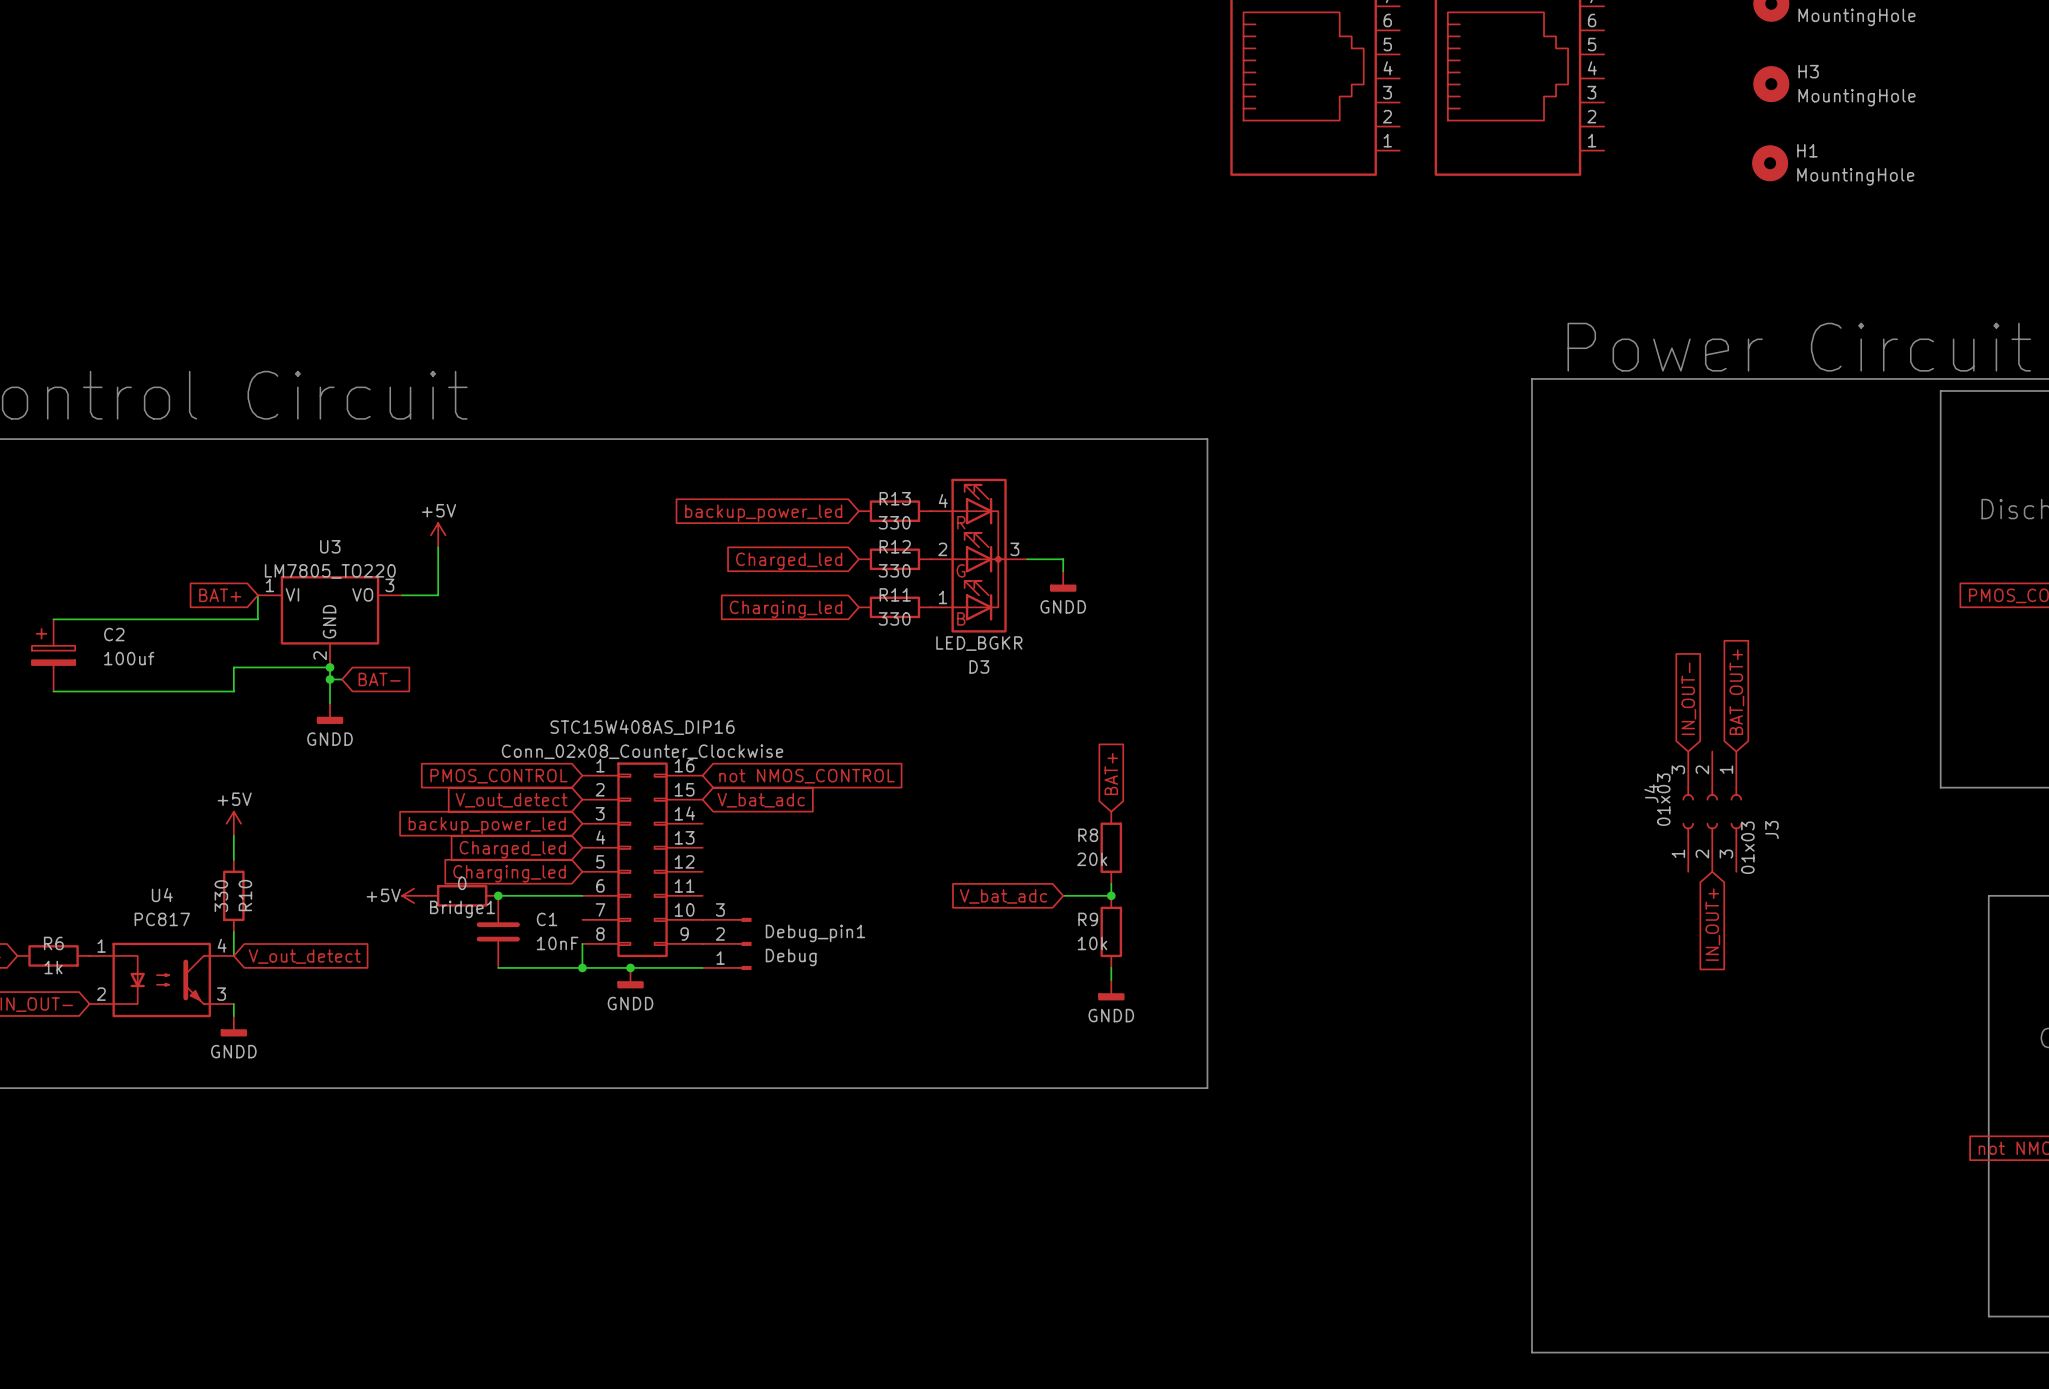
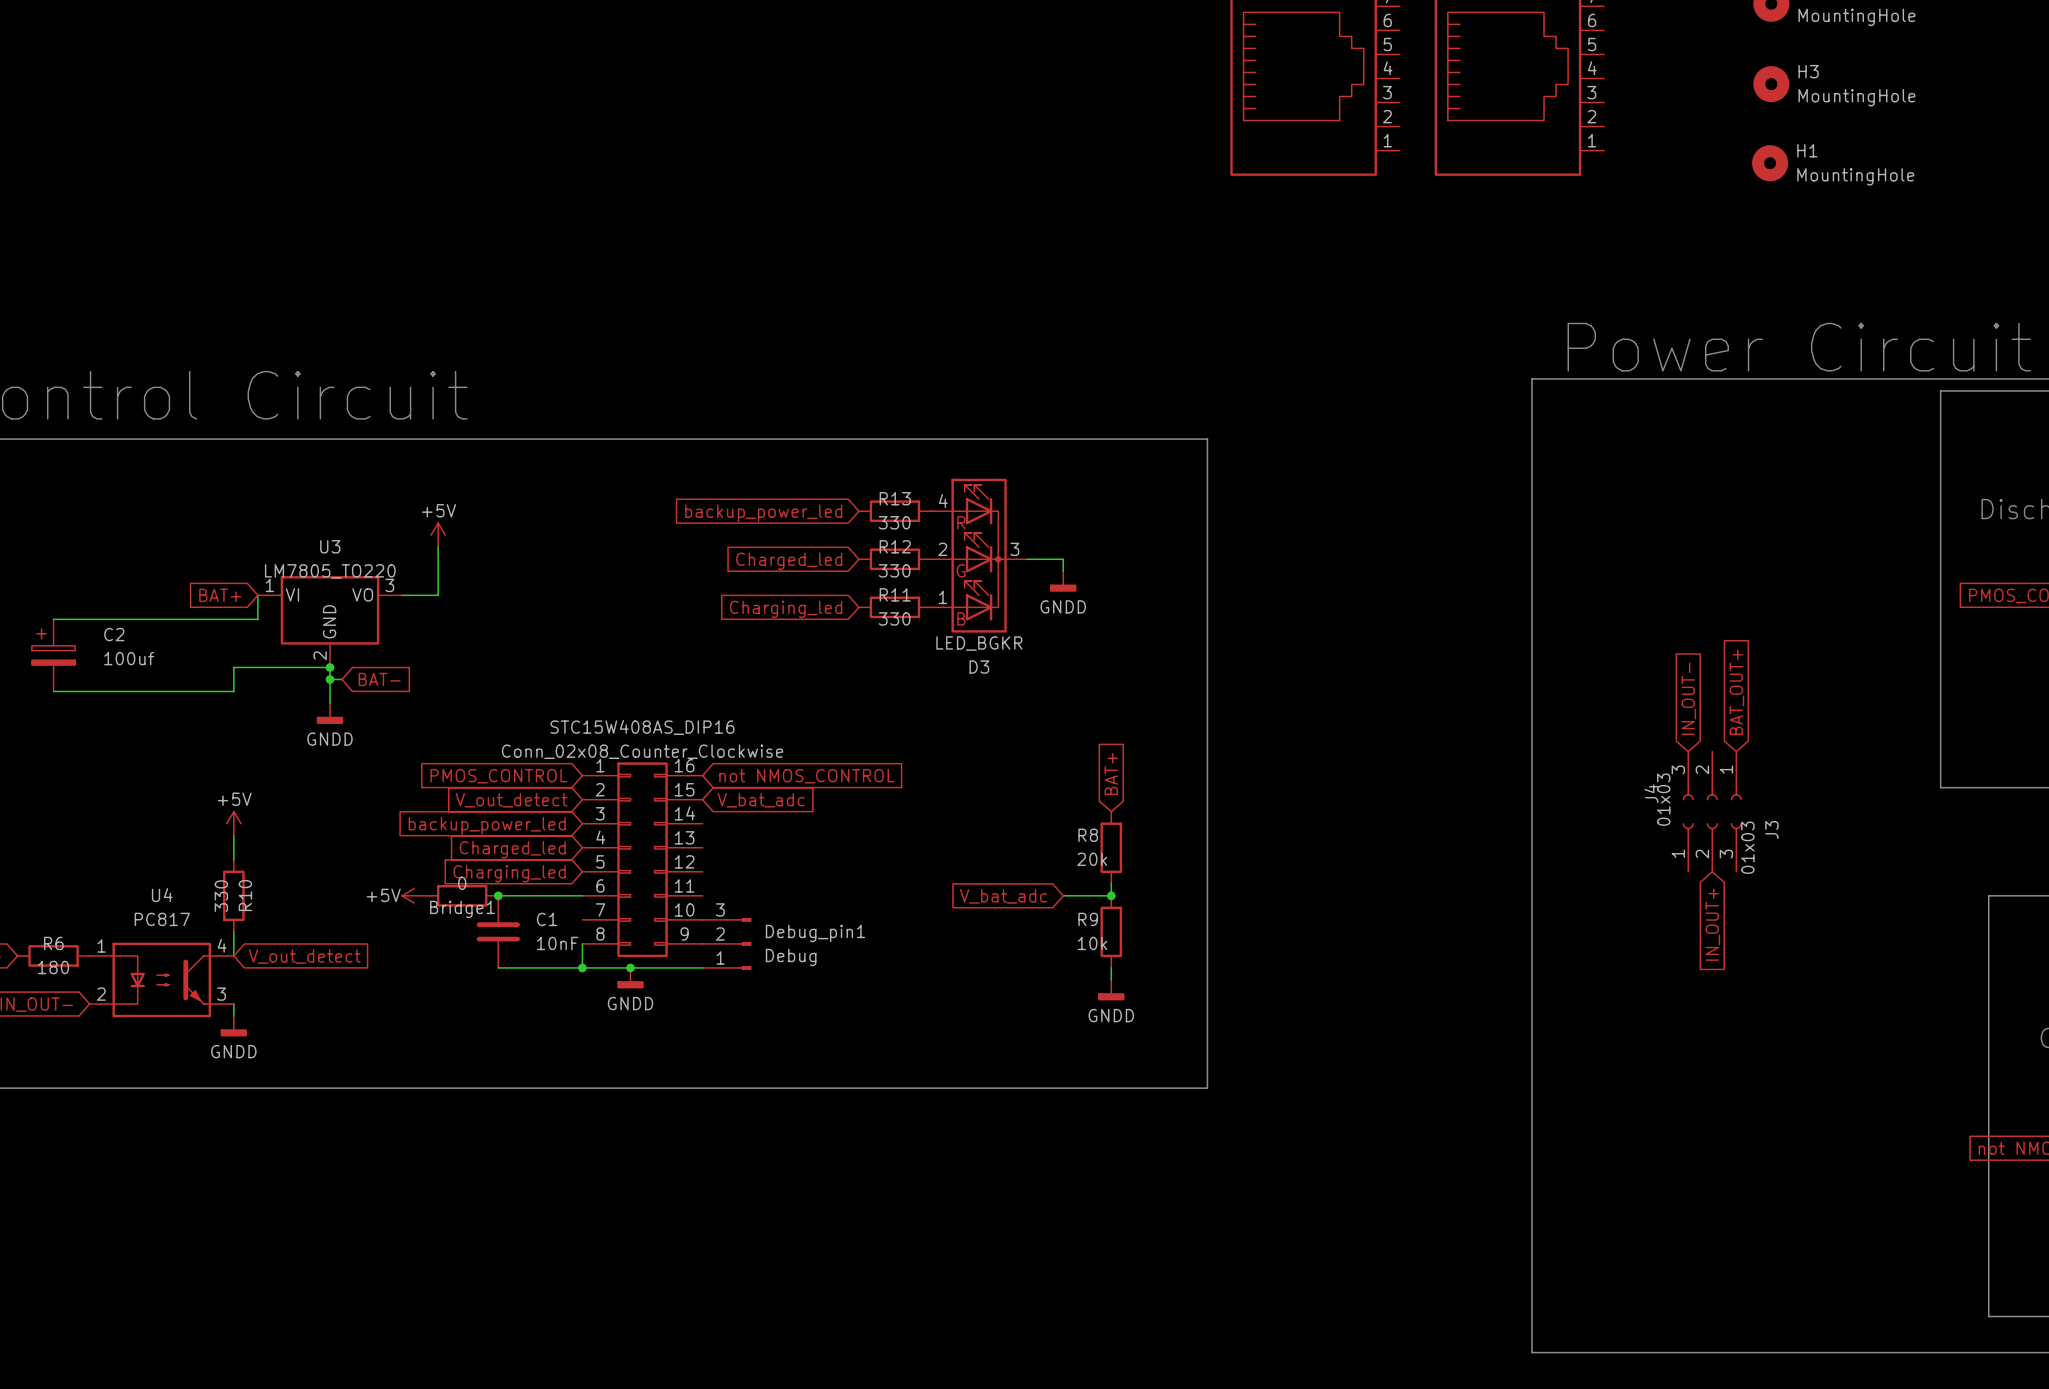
R6 value: 1k (53, 967) -> 180 (53, 967)

